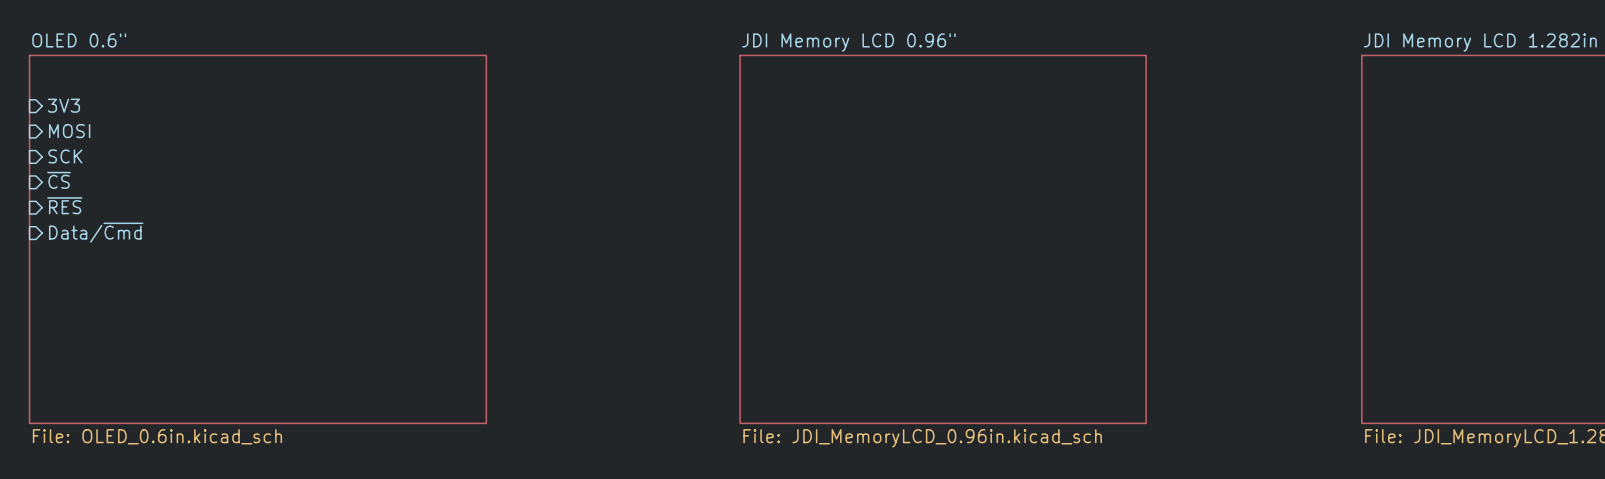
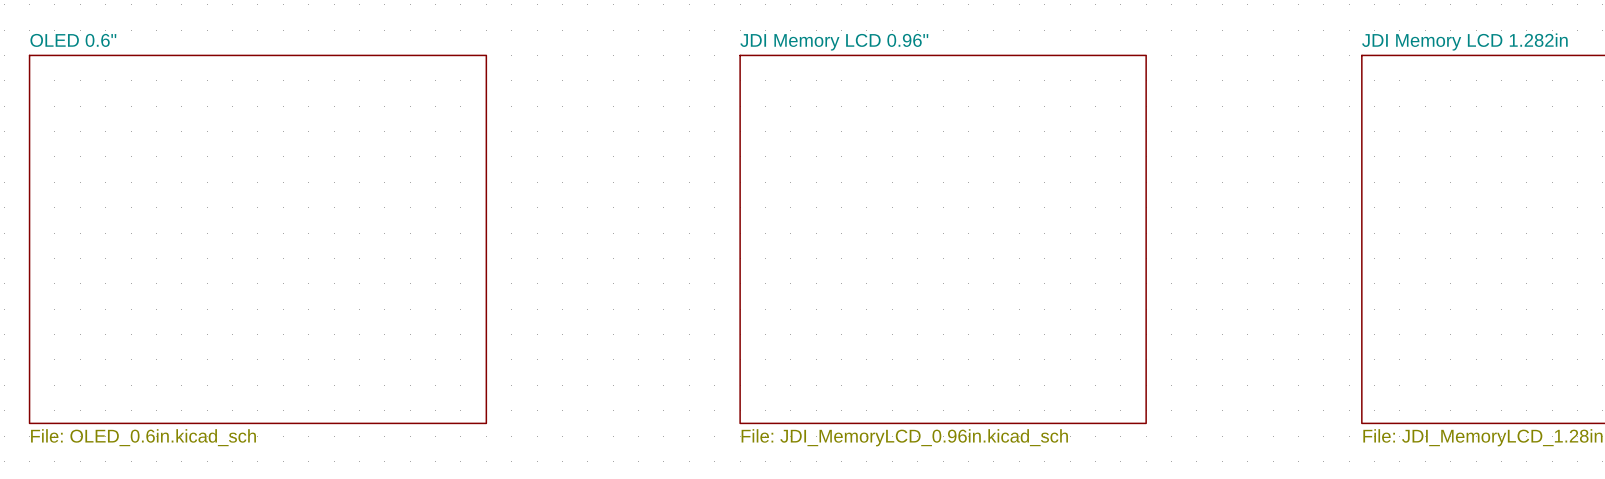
sheet pin: 3V3 (63, 105) -> none
sheet pin: MOSI (69, 131) -> none
sheet pin: SCK (65, 156) -> none
sheet pin: ~{CS} (59, 180) -> none
sheet pin: ~{RES} (64, 205) -> none
sheet pin: Data/~{Cmd} (96, 232) -> none

